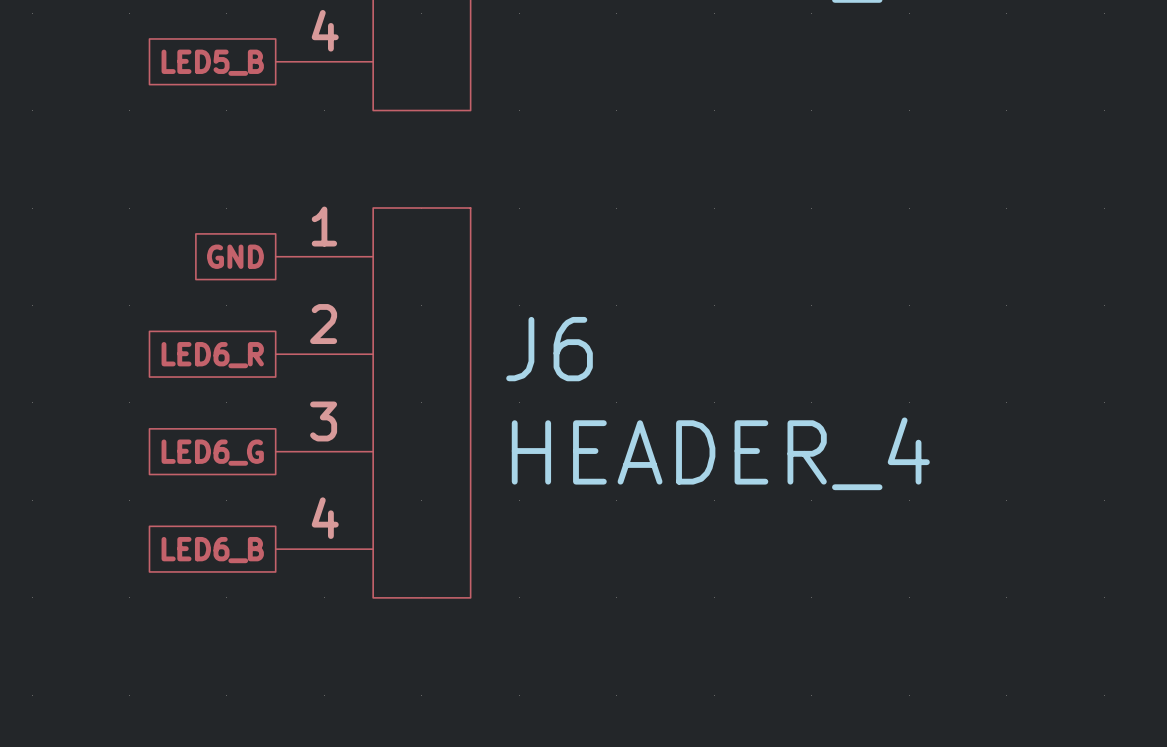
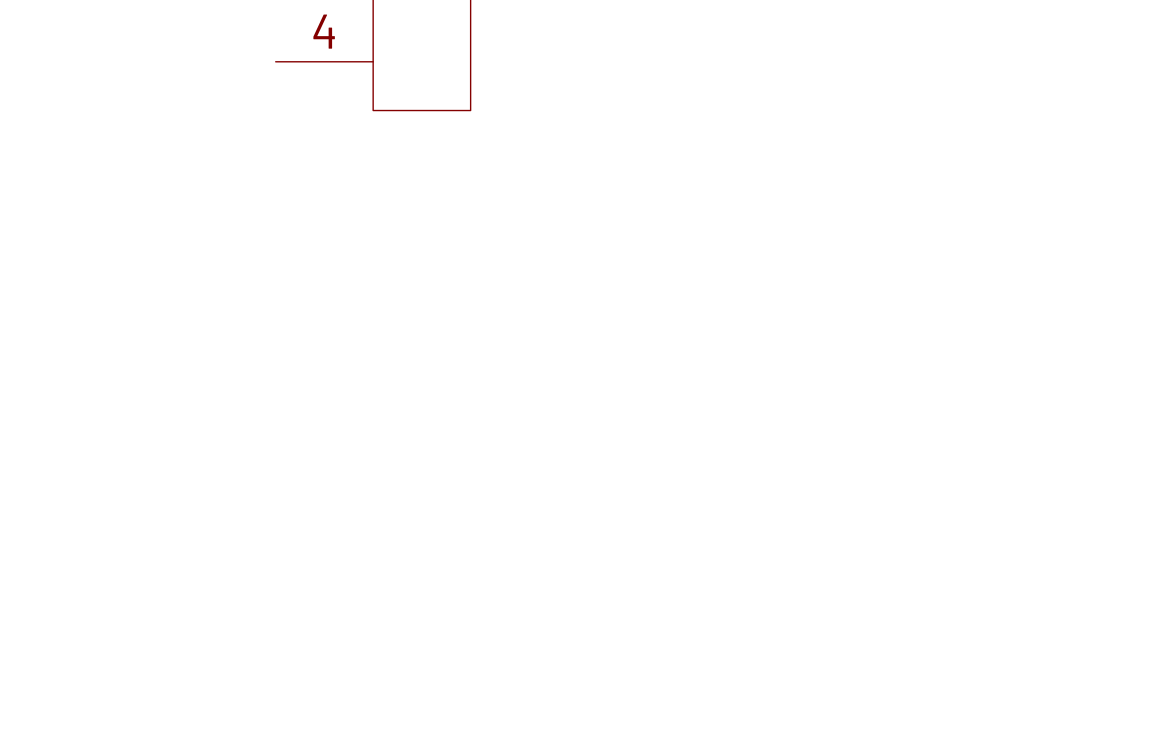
global label: LED5_B (212, 62) -> none
global label: GND (235, 256) -> none
global label: LED6_R (212, 355) -> none
J6: HEADER_4 (373, 402) -> none
global label: LED6_G (212, 452) -> none
global label: LED6_B (212, 550) -> none

